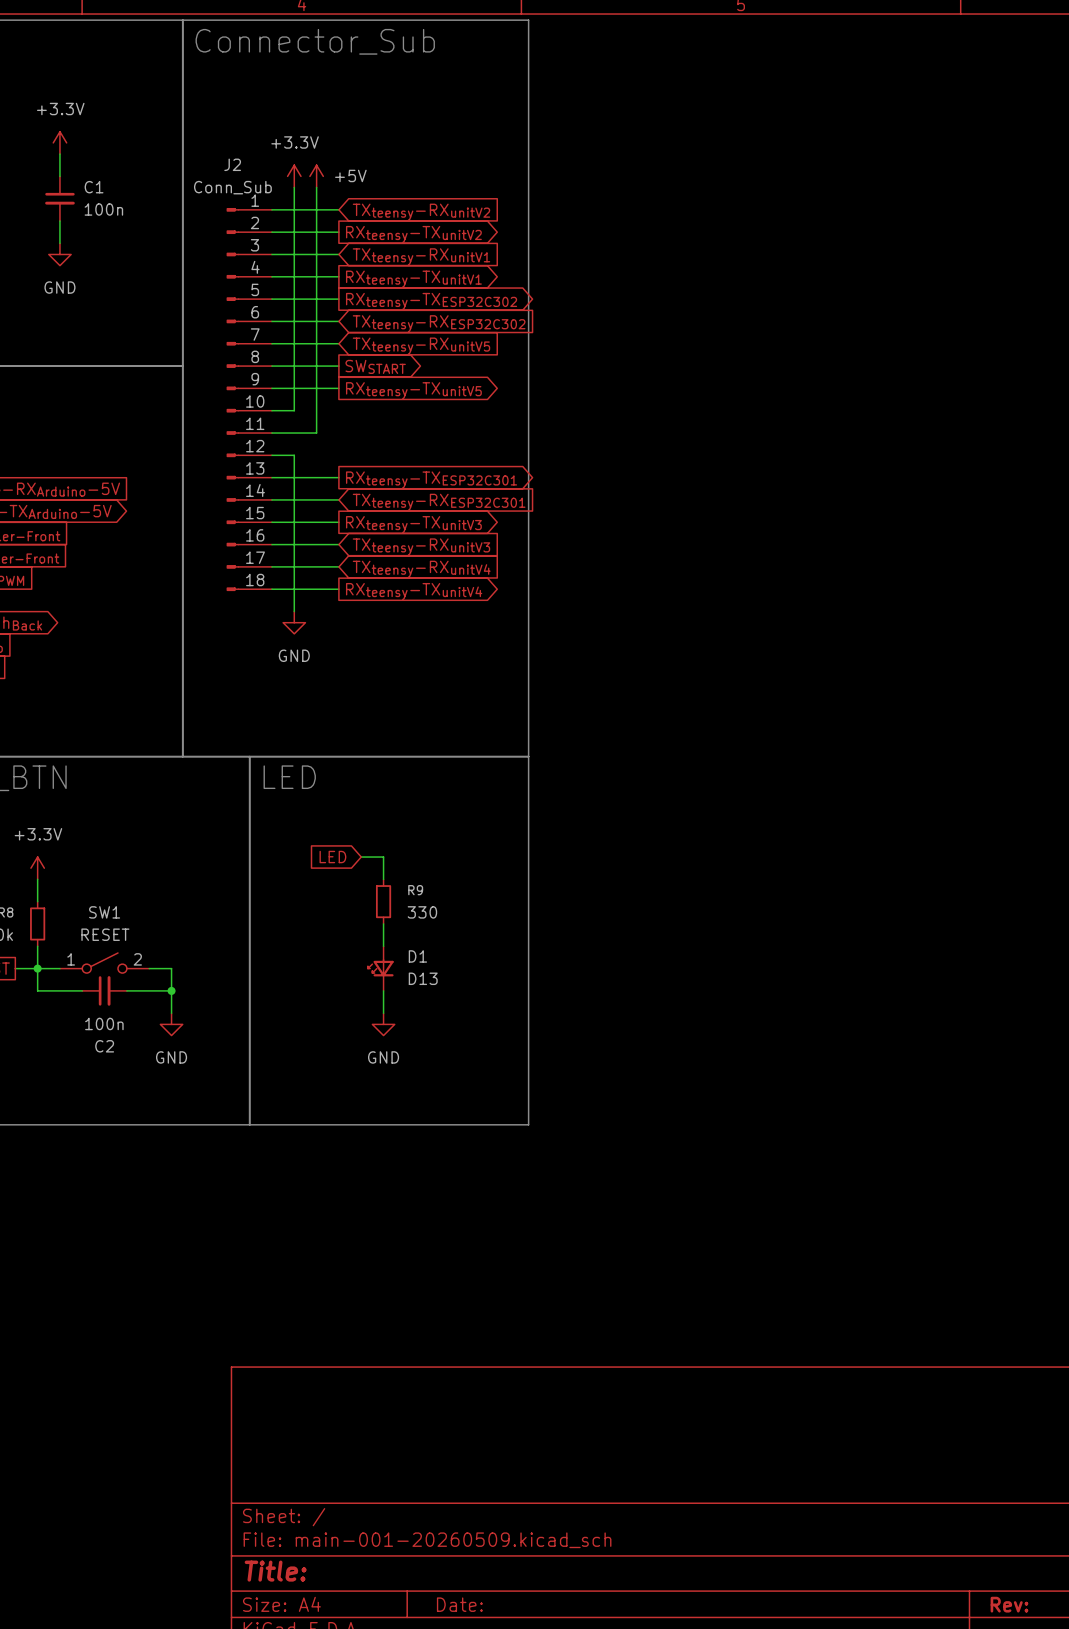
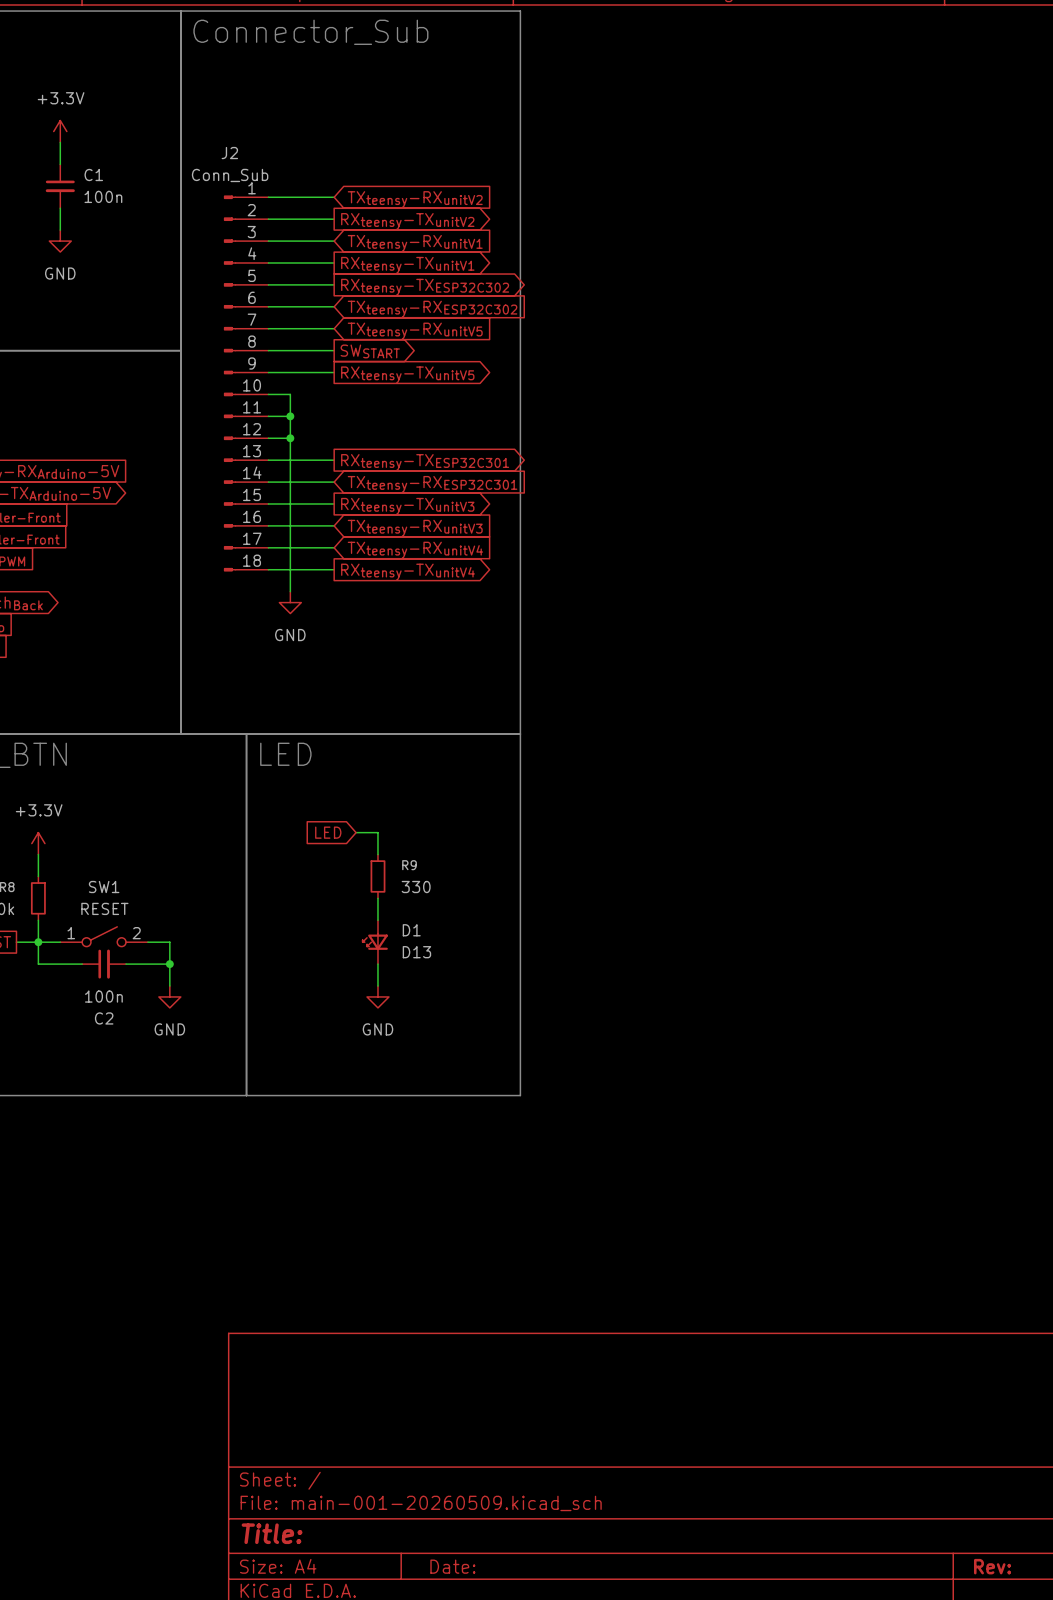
power symbol: +3.3V (294, 176) -> none
power symbol: +5V (316, 176) -> none
wire: (294, 187) (294, 410) -> (290, 438) (290, 394)
wire: (316, 187) (316, 433) (294, 433) -> none
junction: none -> (290, 416)
junction: none -> (290, 438)

